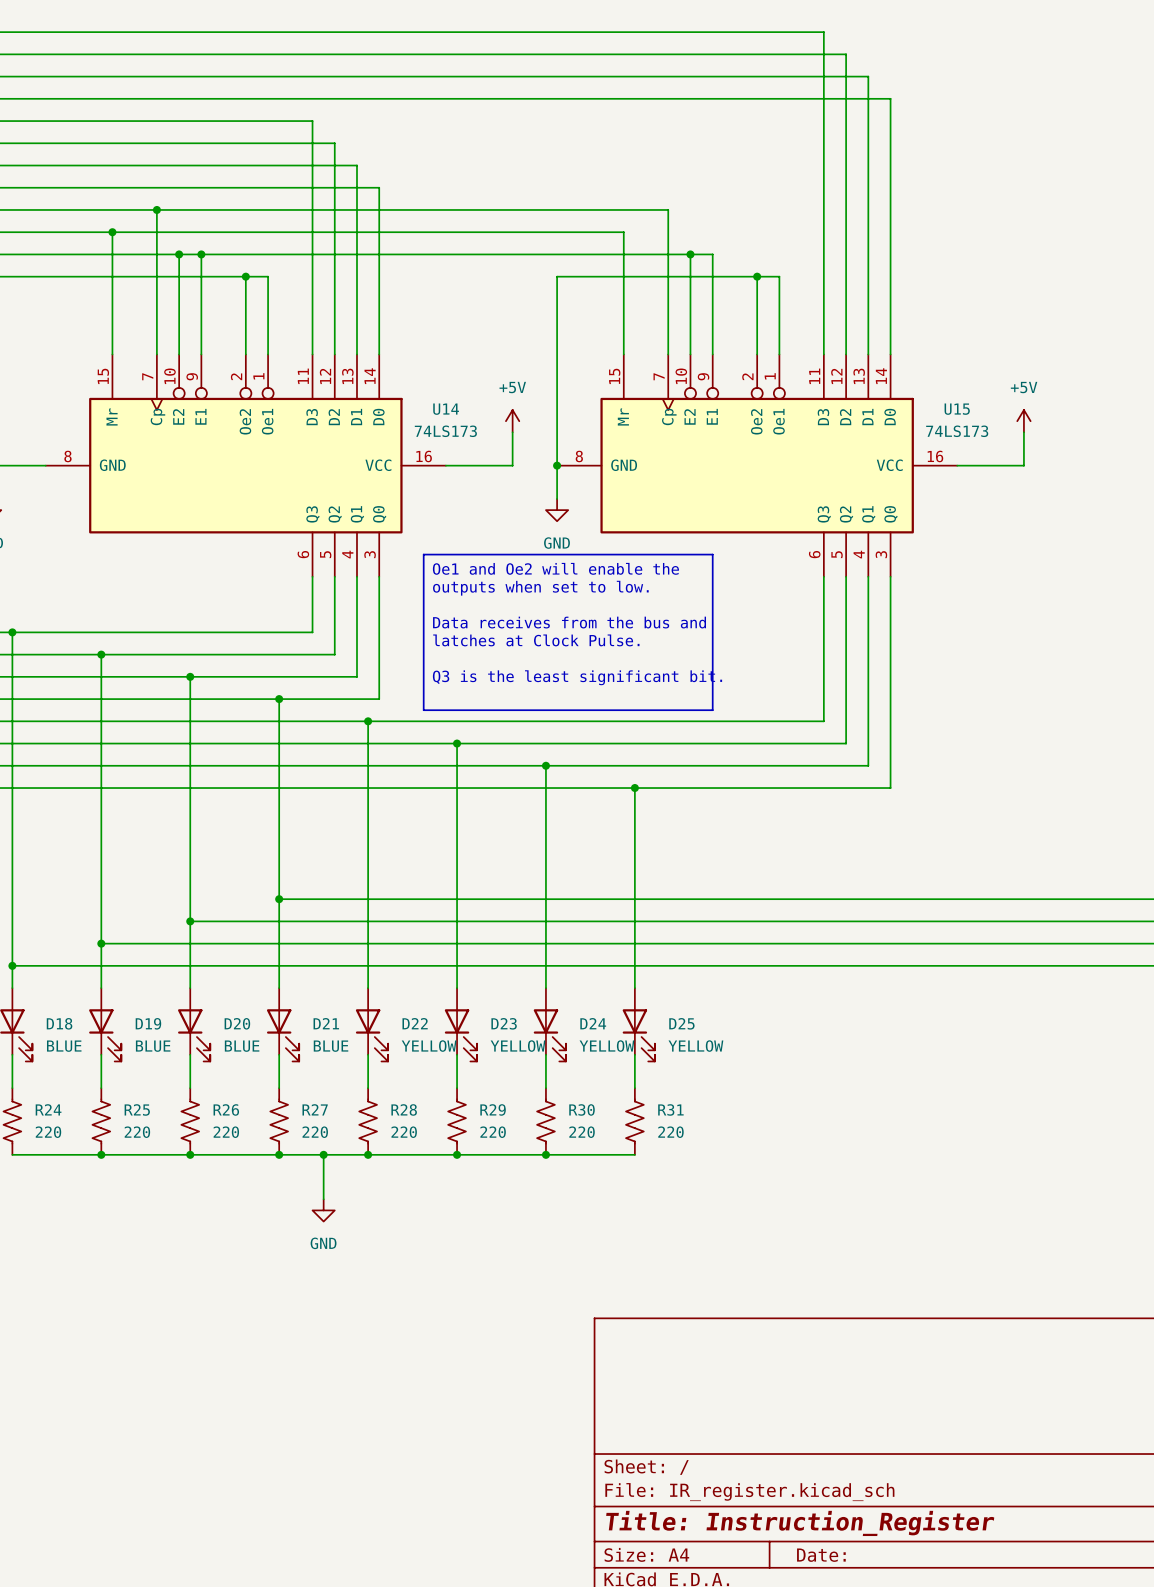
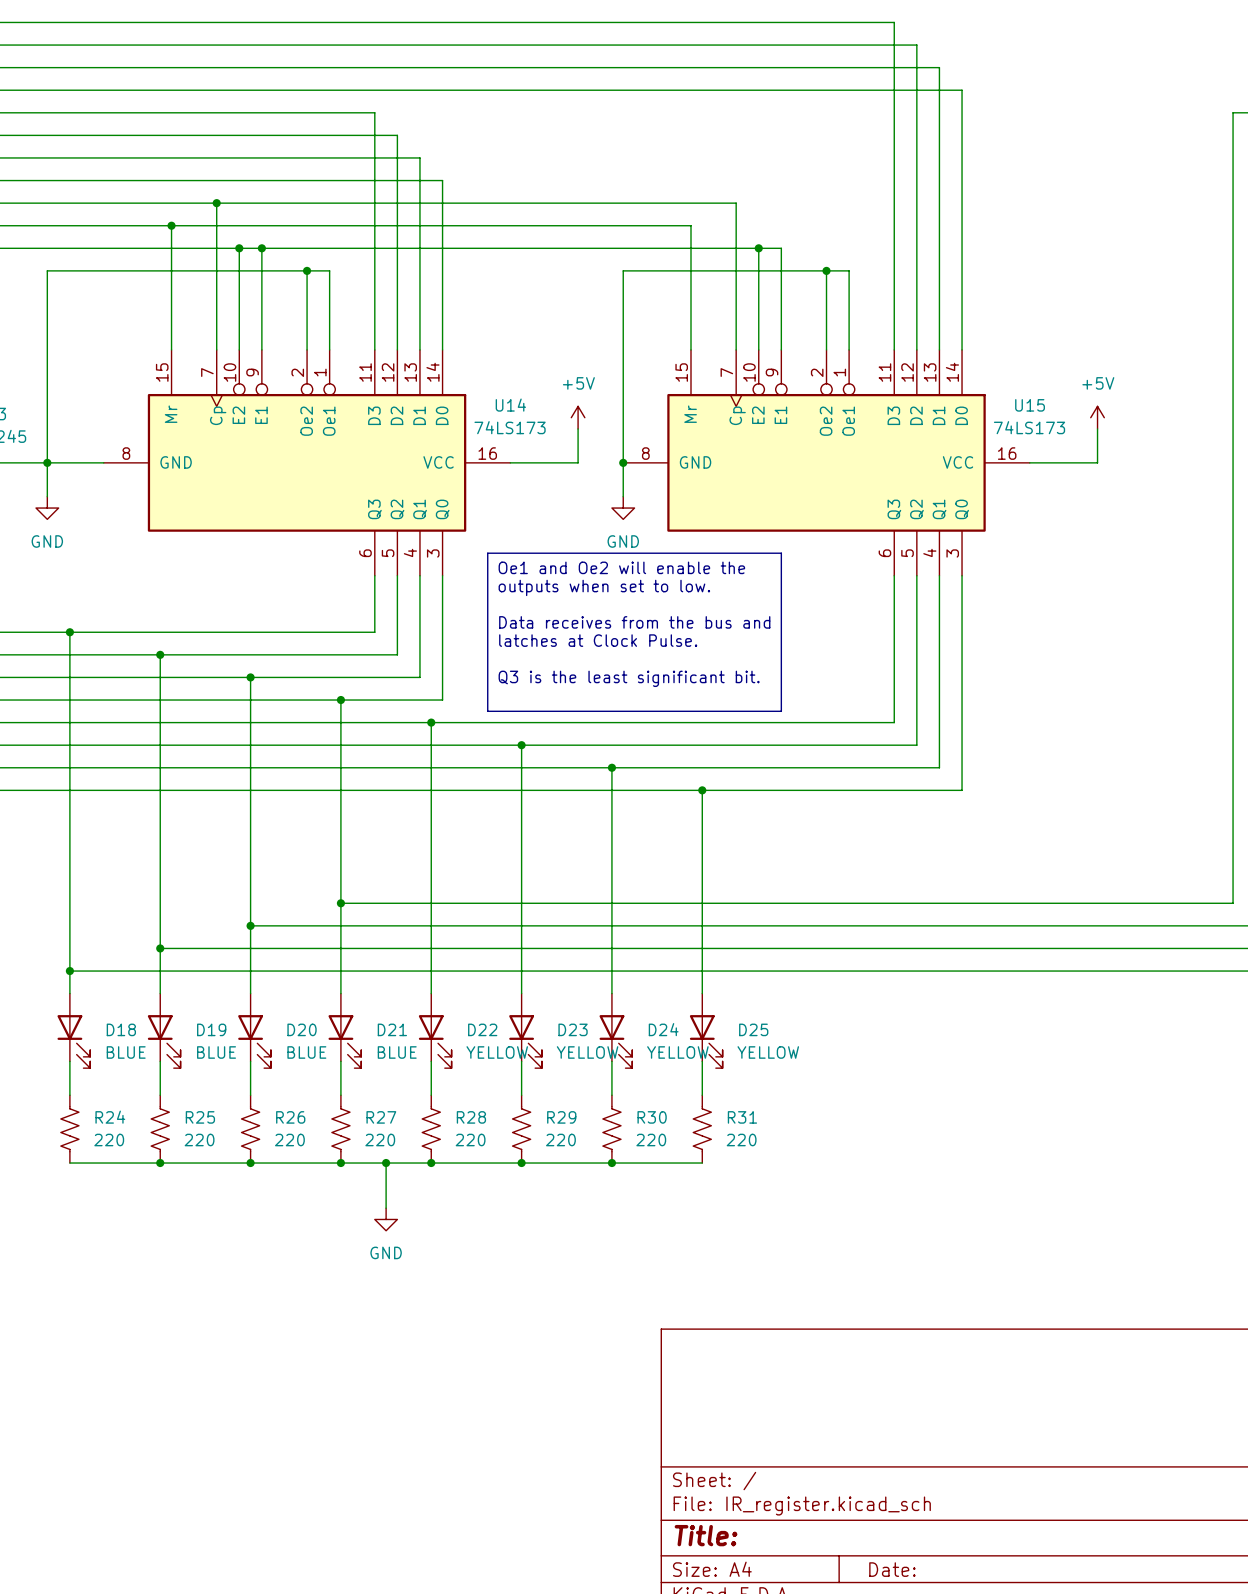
title block: Title: Instruction_Register (800, 1523) -> Title: (706, 1535)

